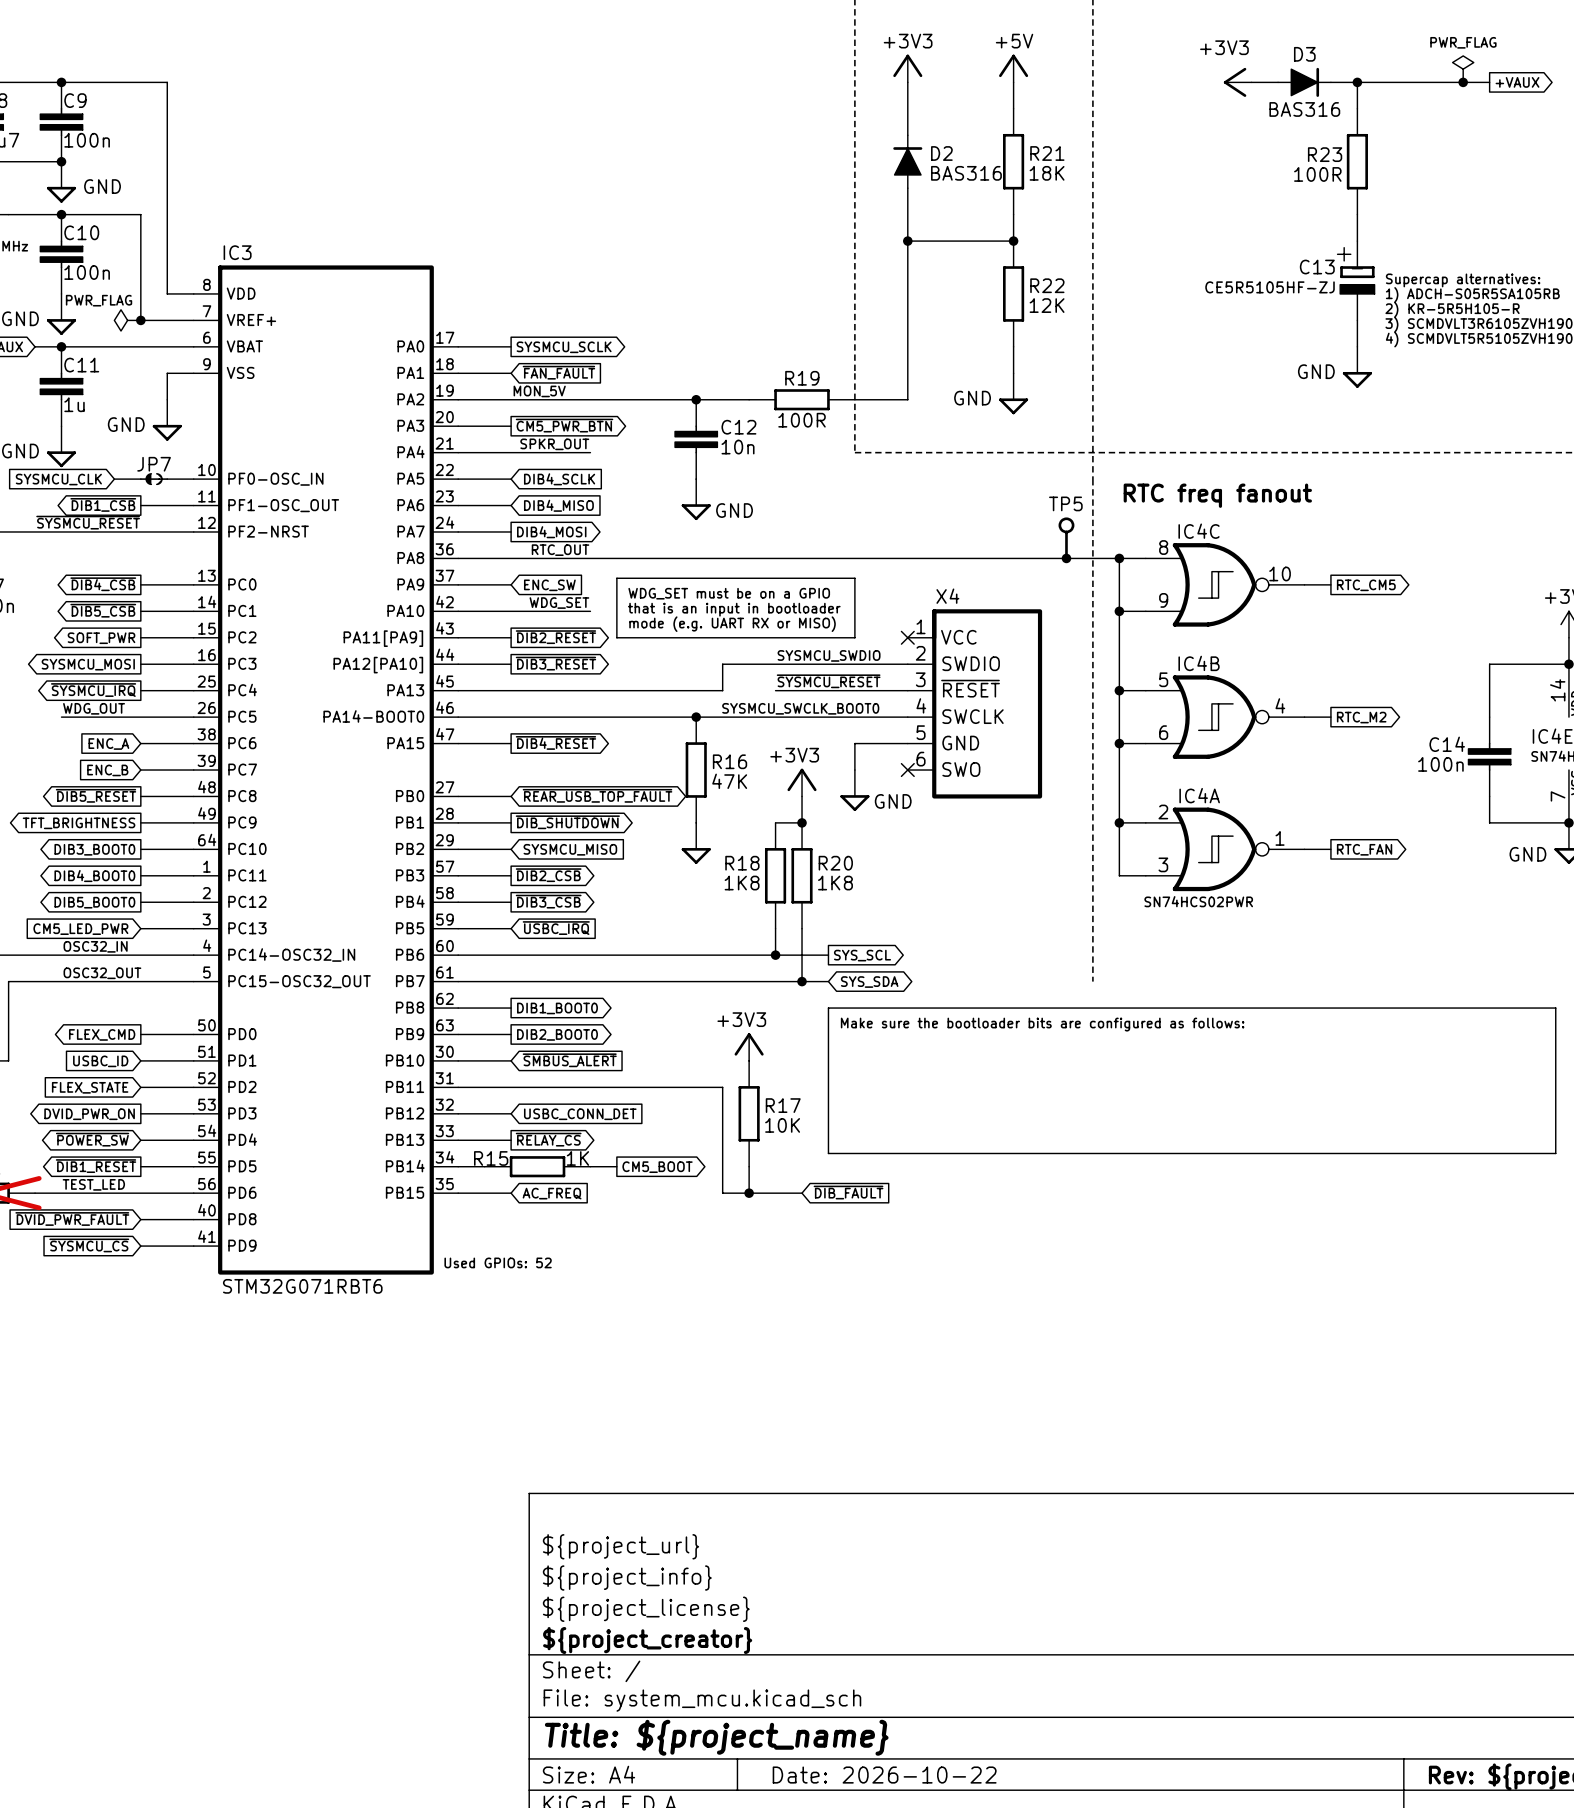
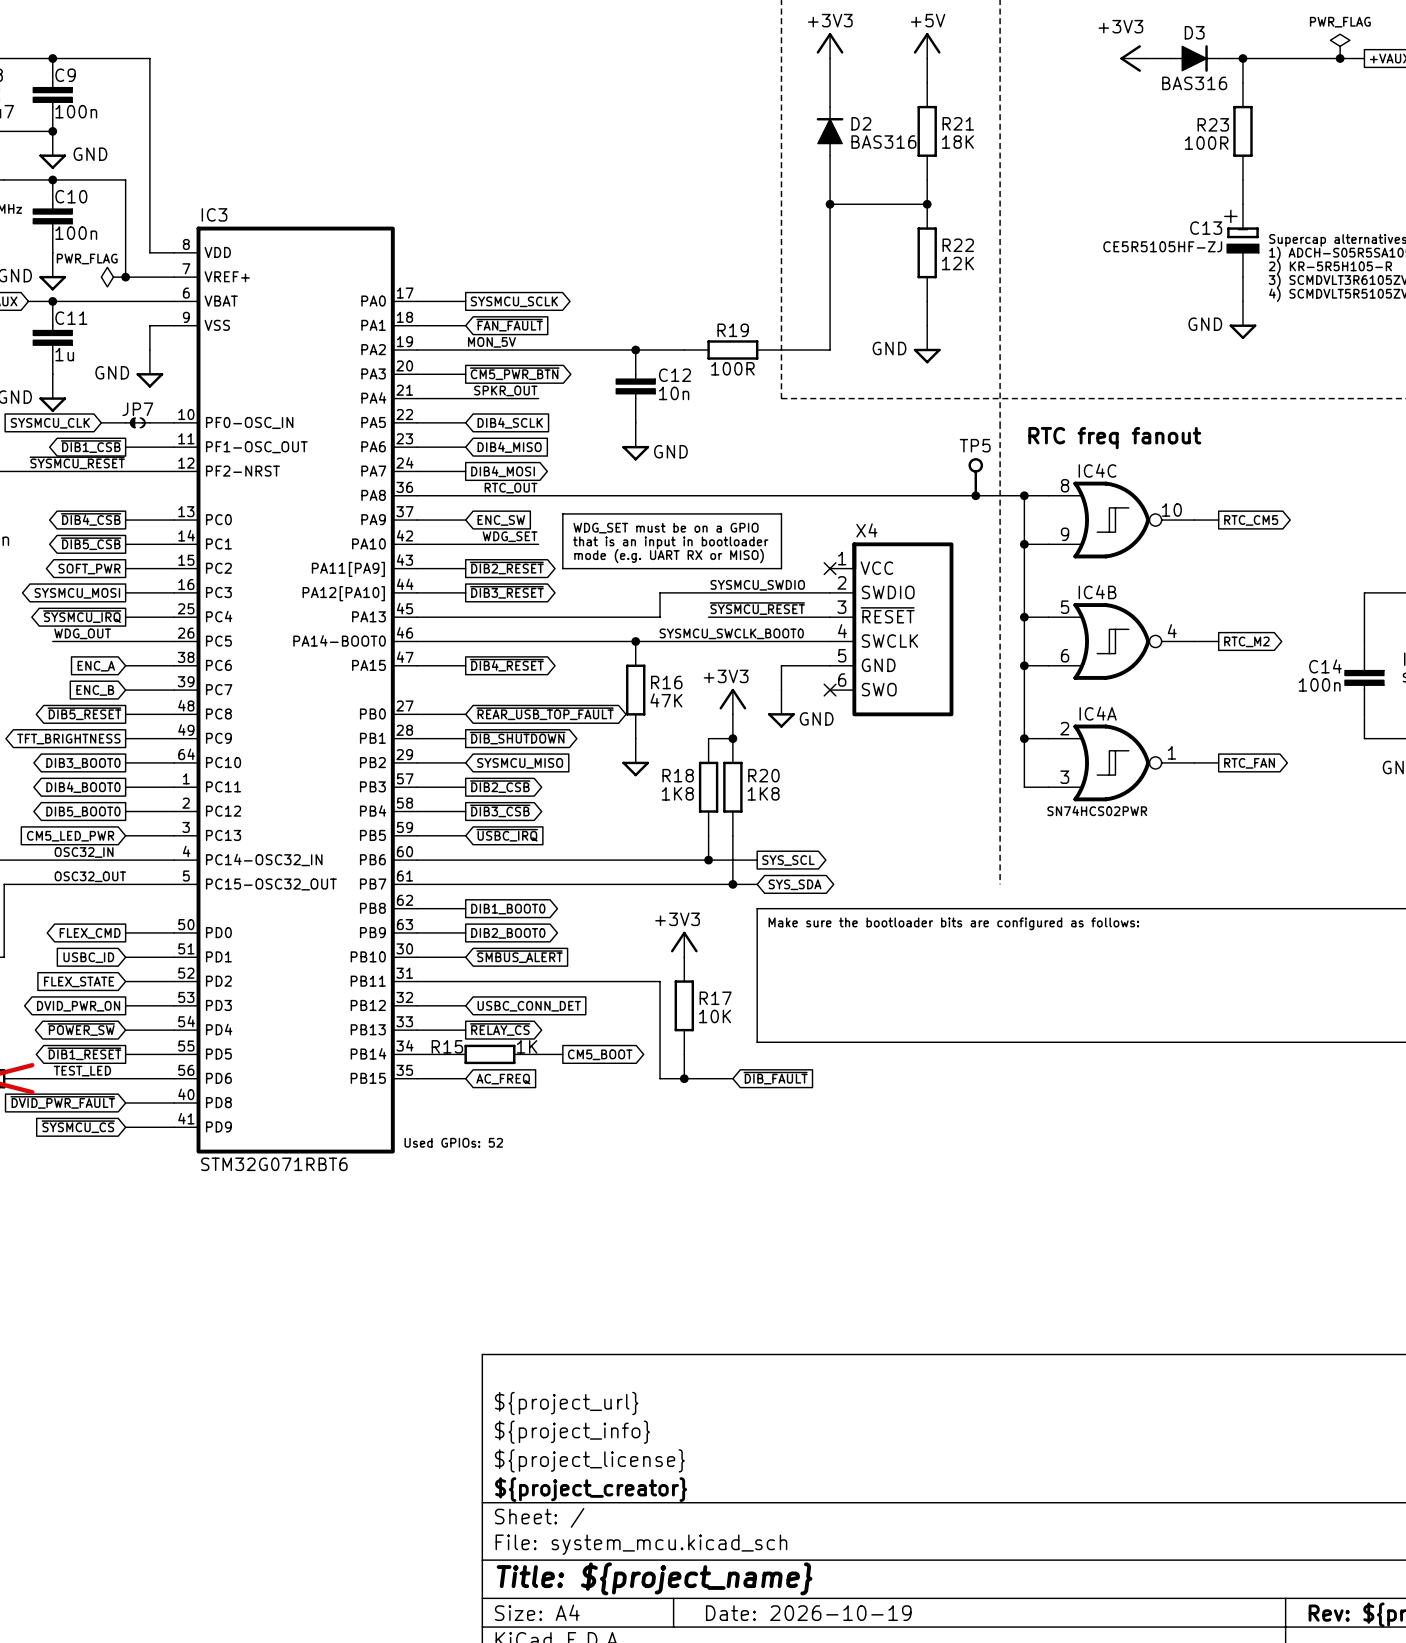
title block: Date: 2026-10-22 (884, 1775) -> Date: 2026-10-19 (808, 1613)

